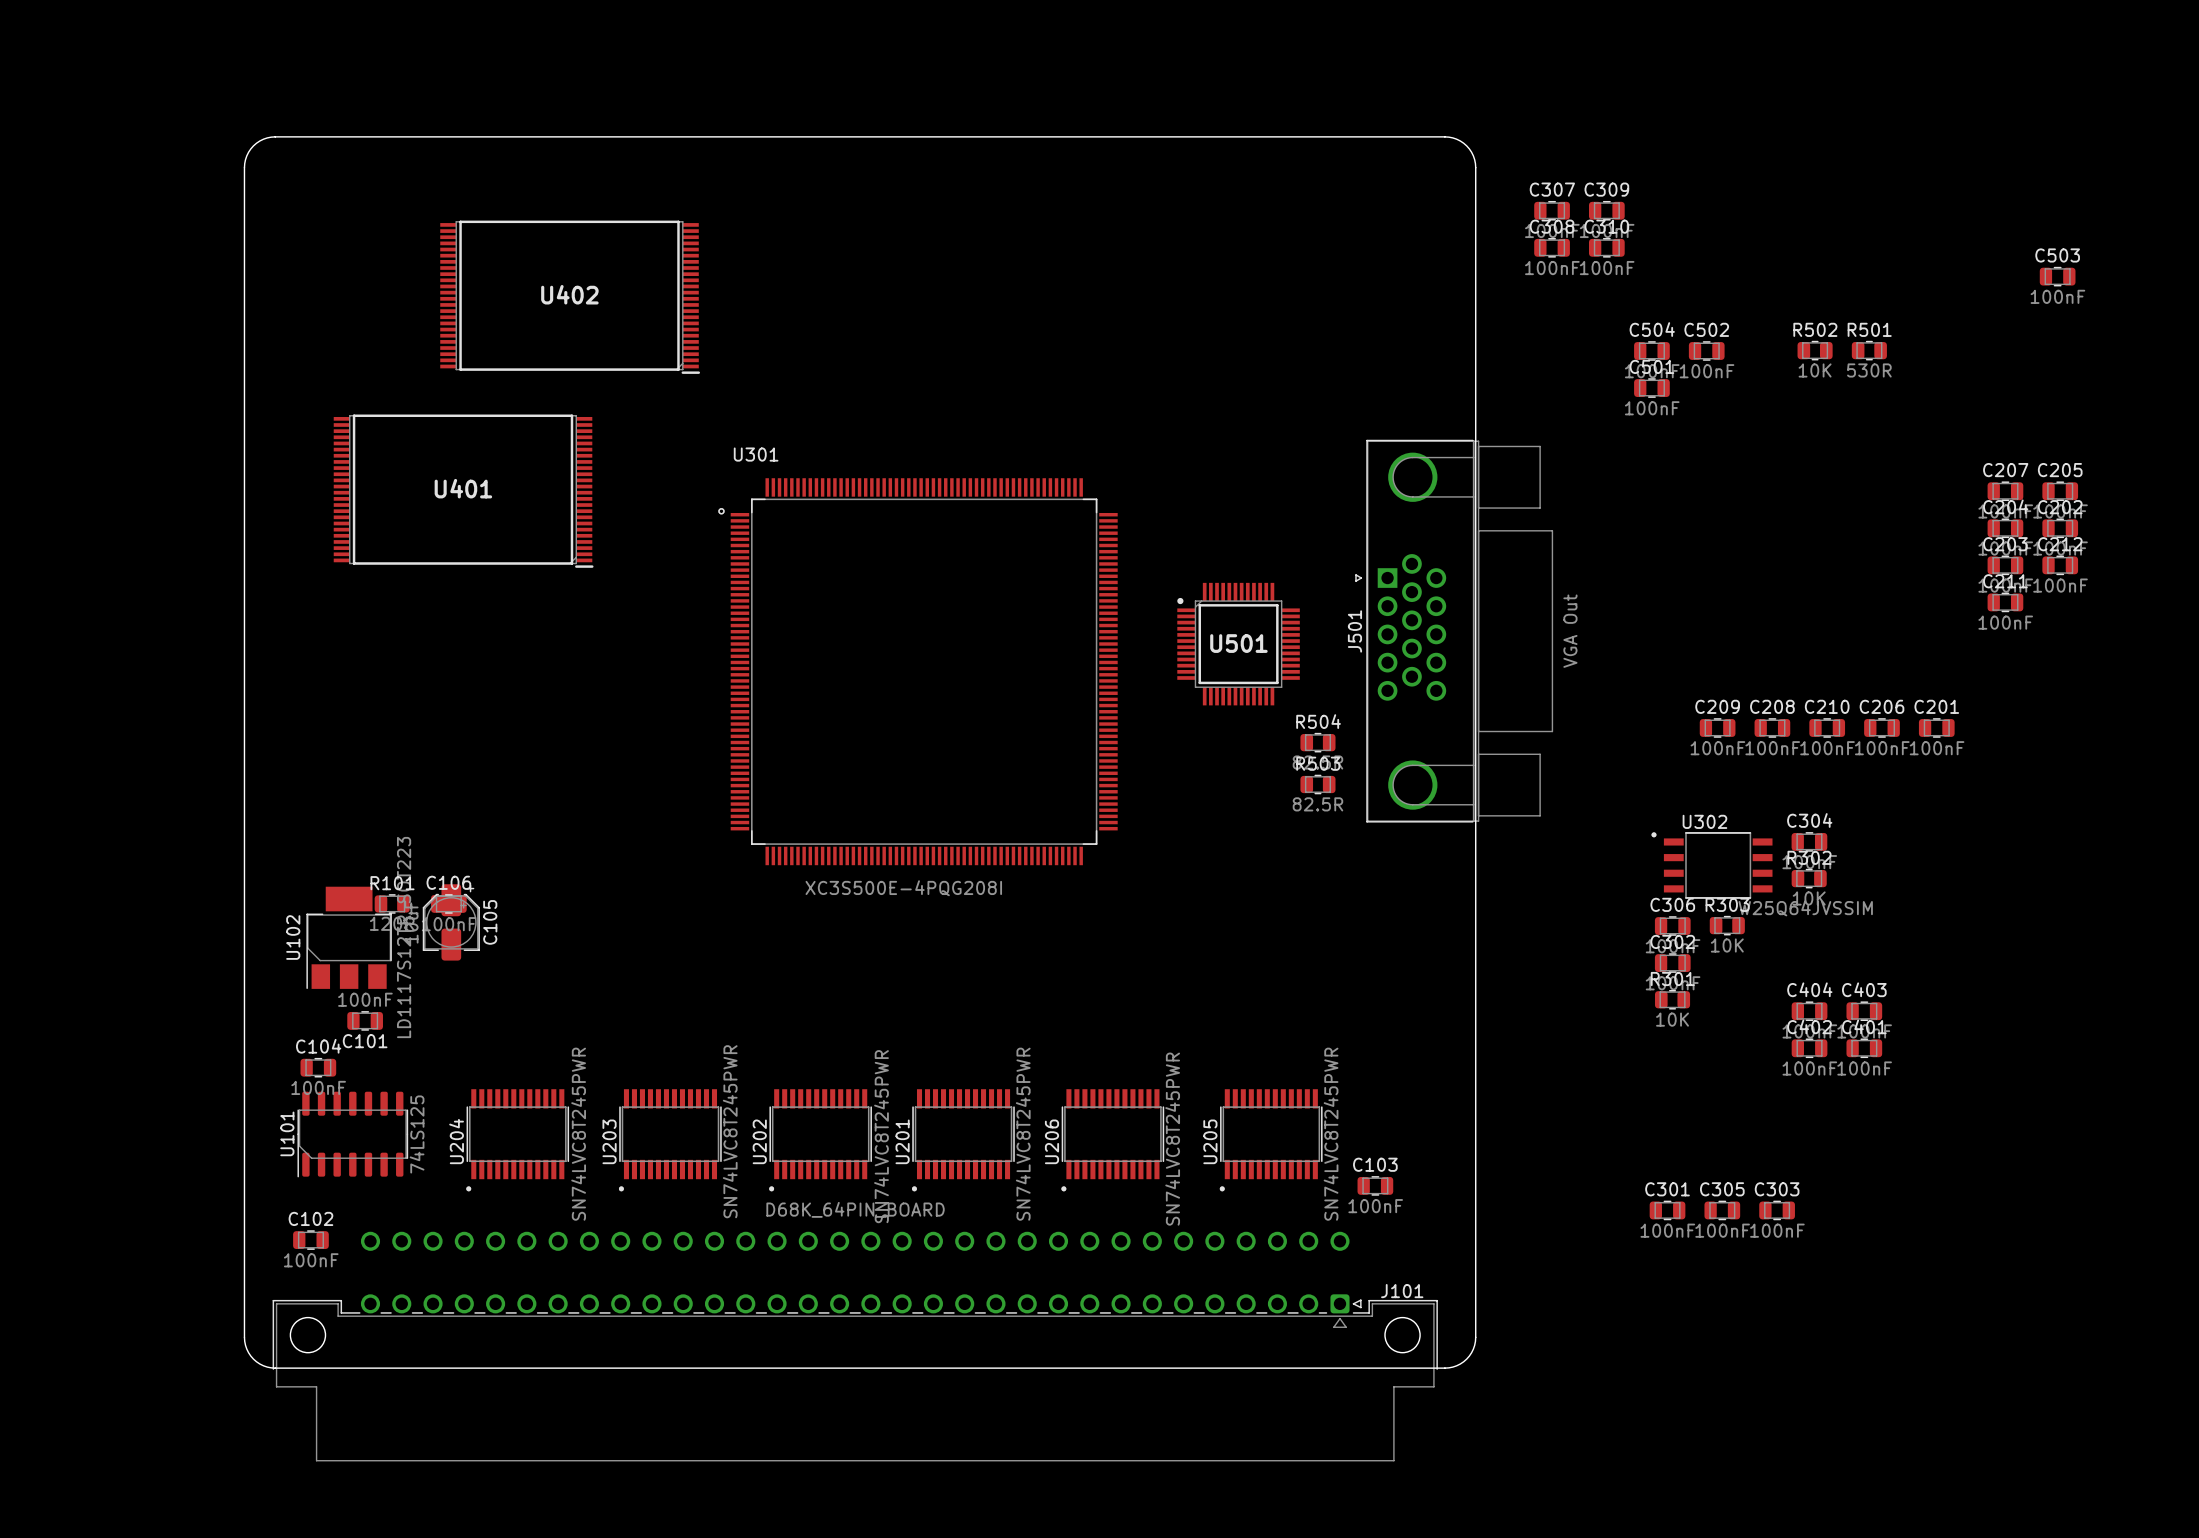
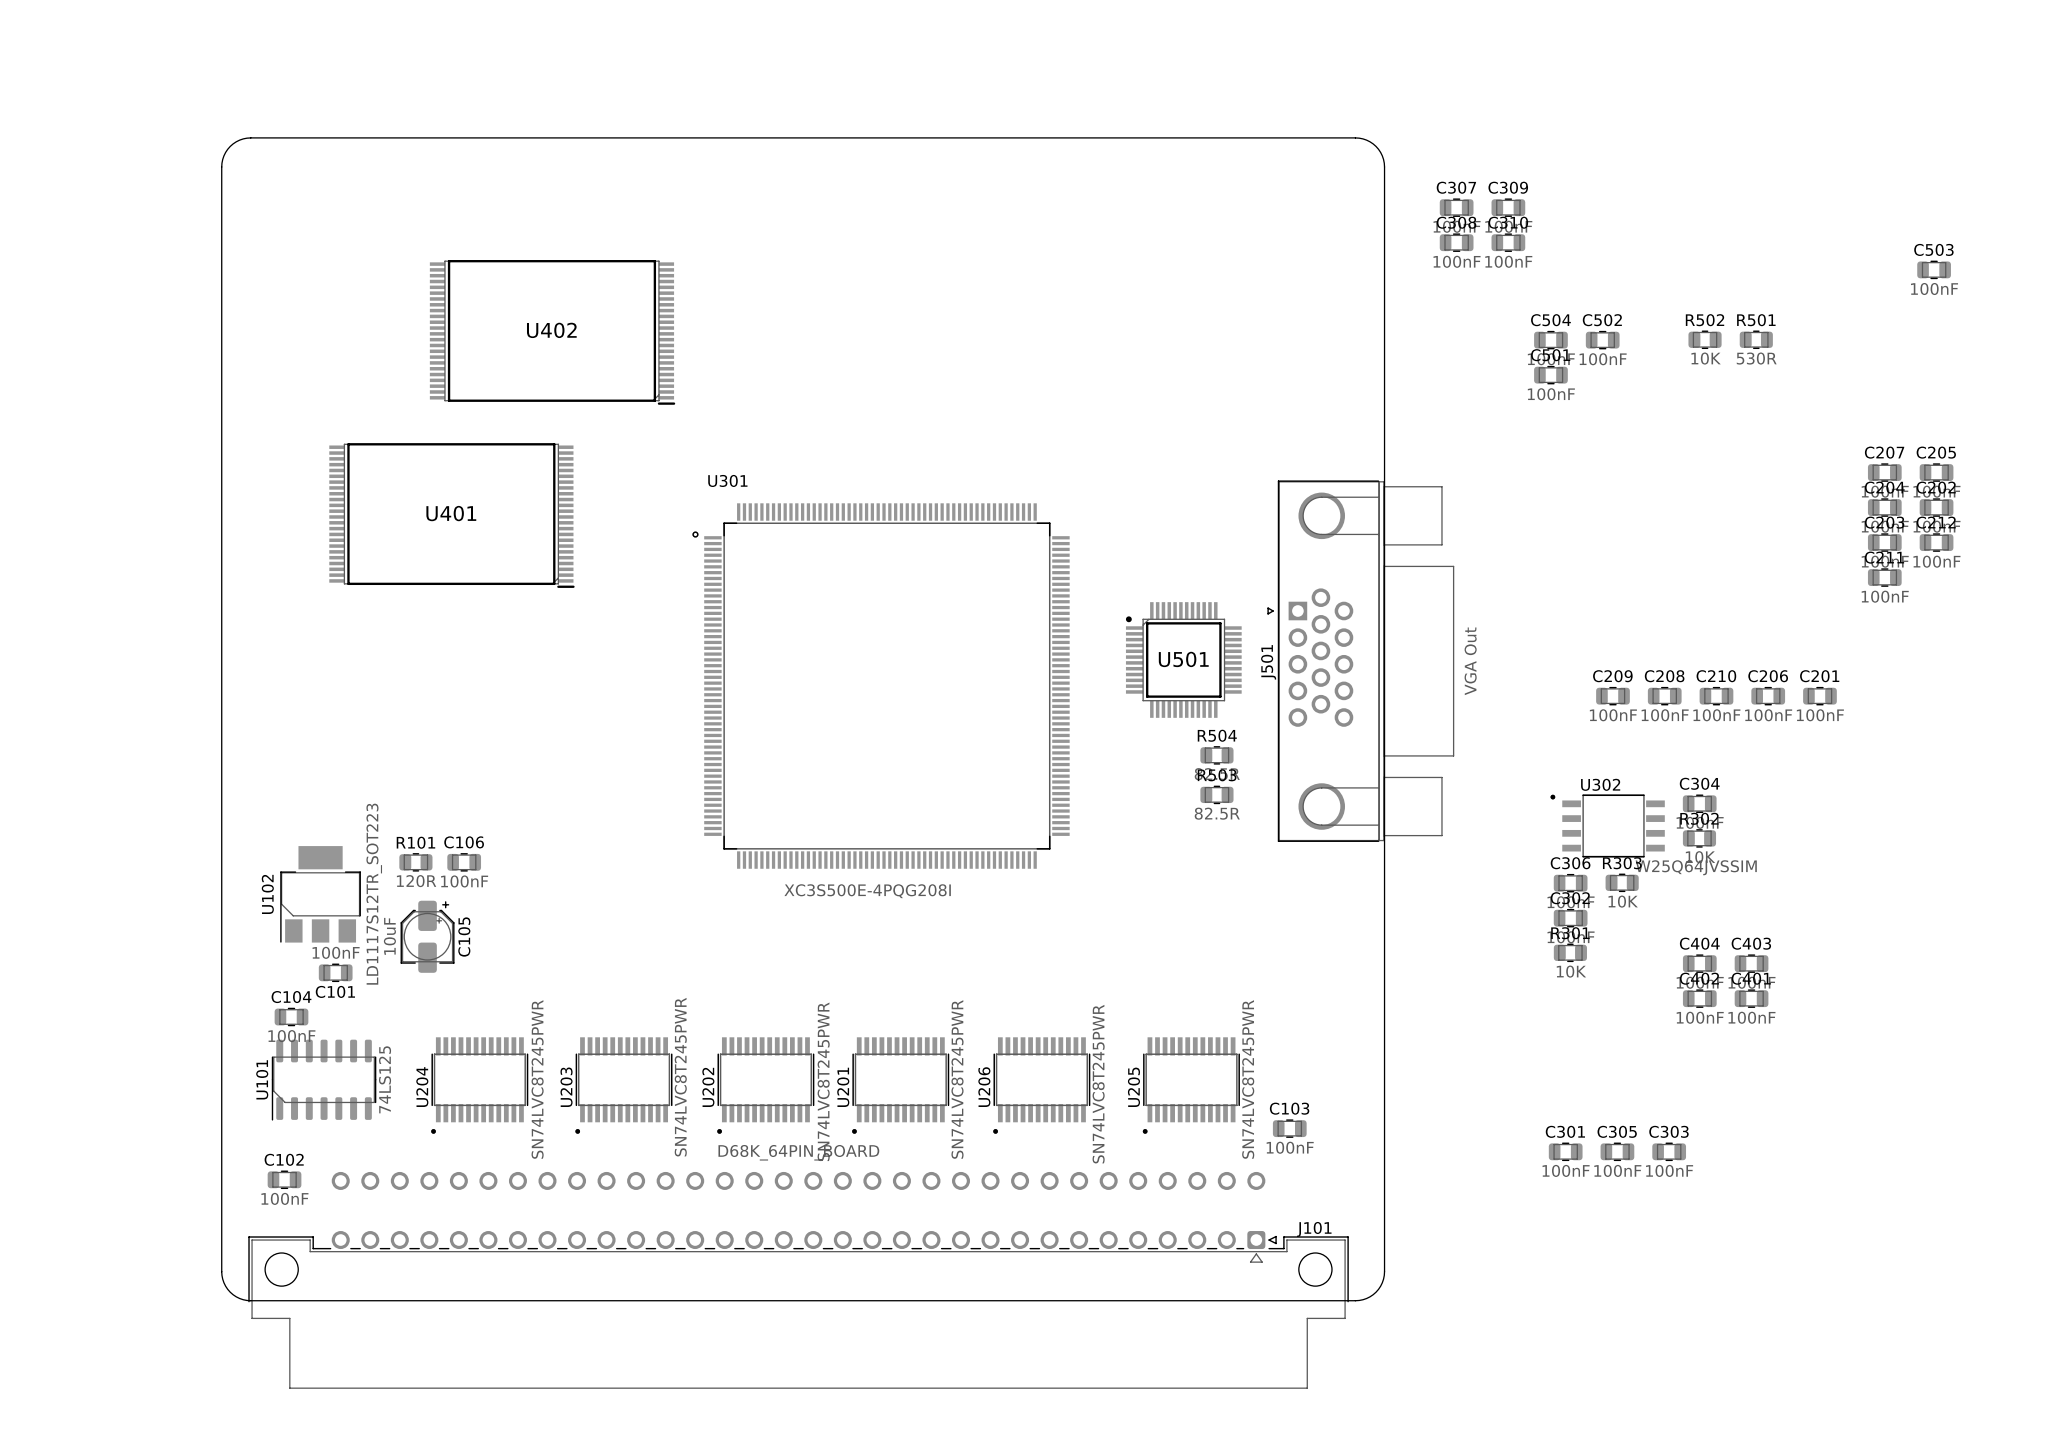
U402 position: (570, 297) -> (552, 332)
U401 position: (463, 491) -> (451, 515)
J501 position: (1454, 631) -> (1360, 661)
U501 position: (1238, 644) -> (1183, 659)
U301 position: (918, 671) -> (881, 686)
R504 position: (1317, 742) -> (1216, 755)
R503 position: (1317, 784) -> (1216, 794)
R101 position: (392, 903) -> (415, 862)
C106 position: (448, 903) -> (464, 862)
C105 position: (451, 922) -> (427, 936)

